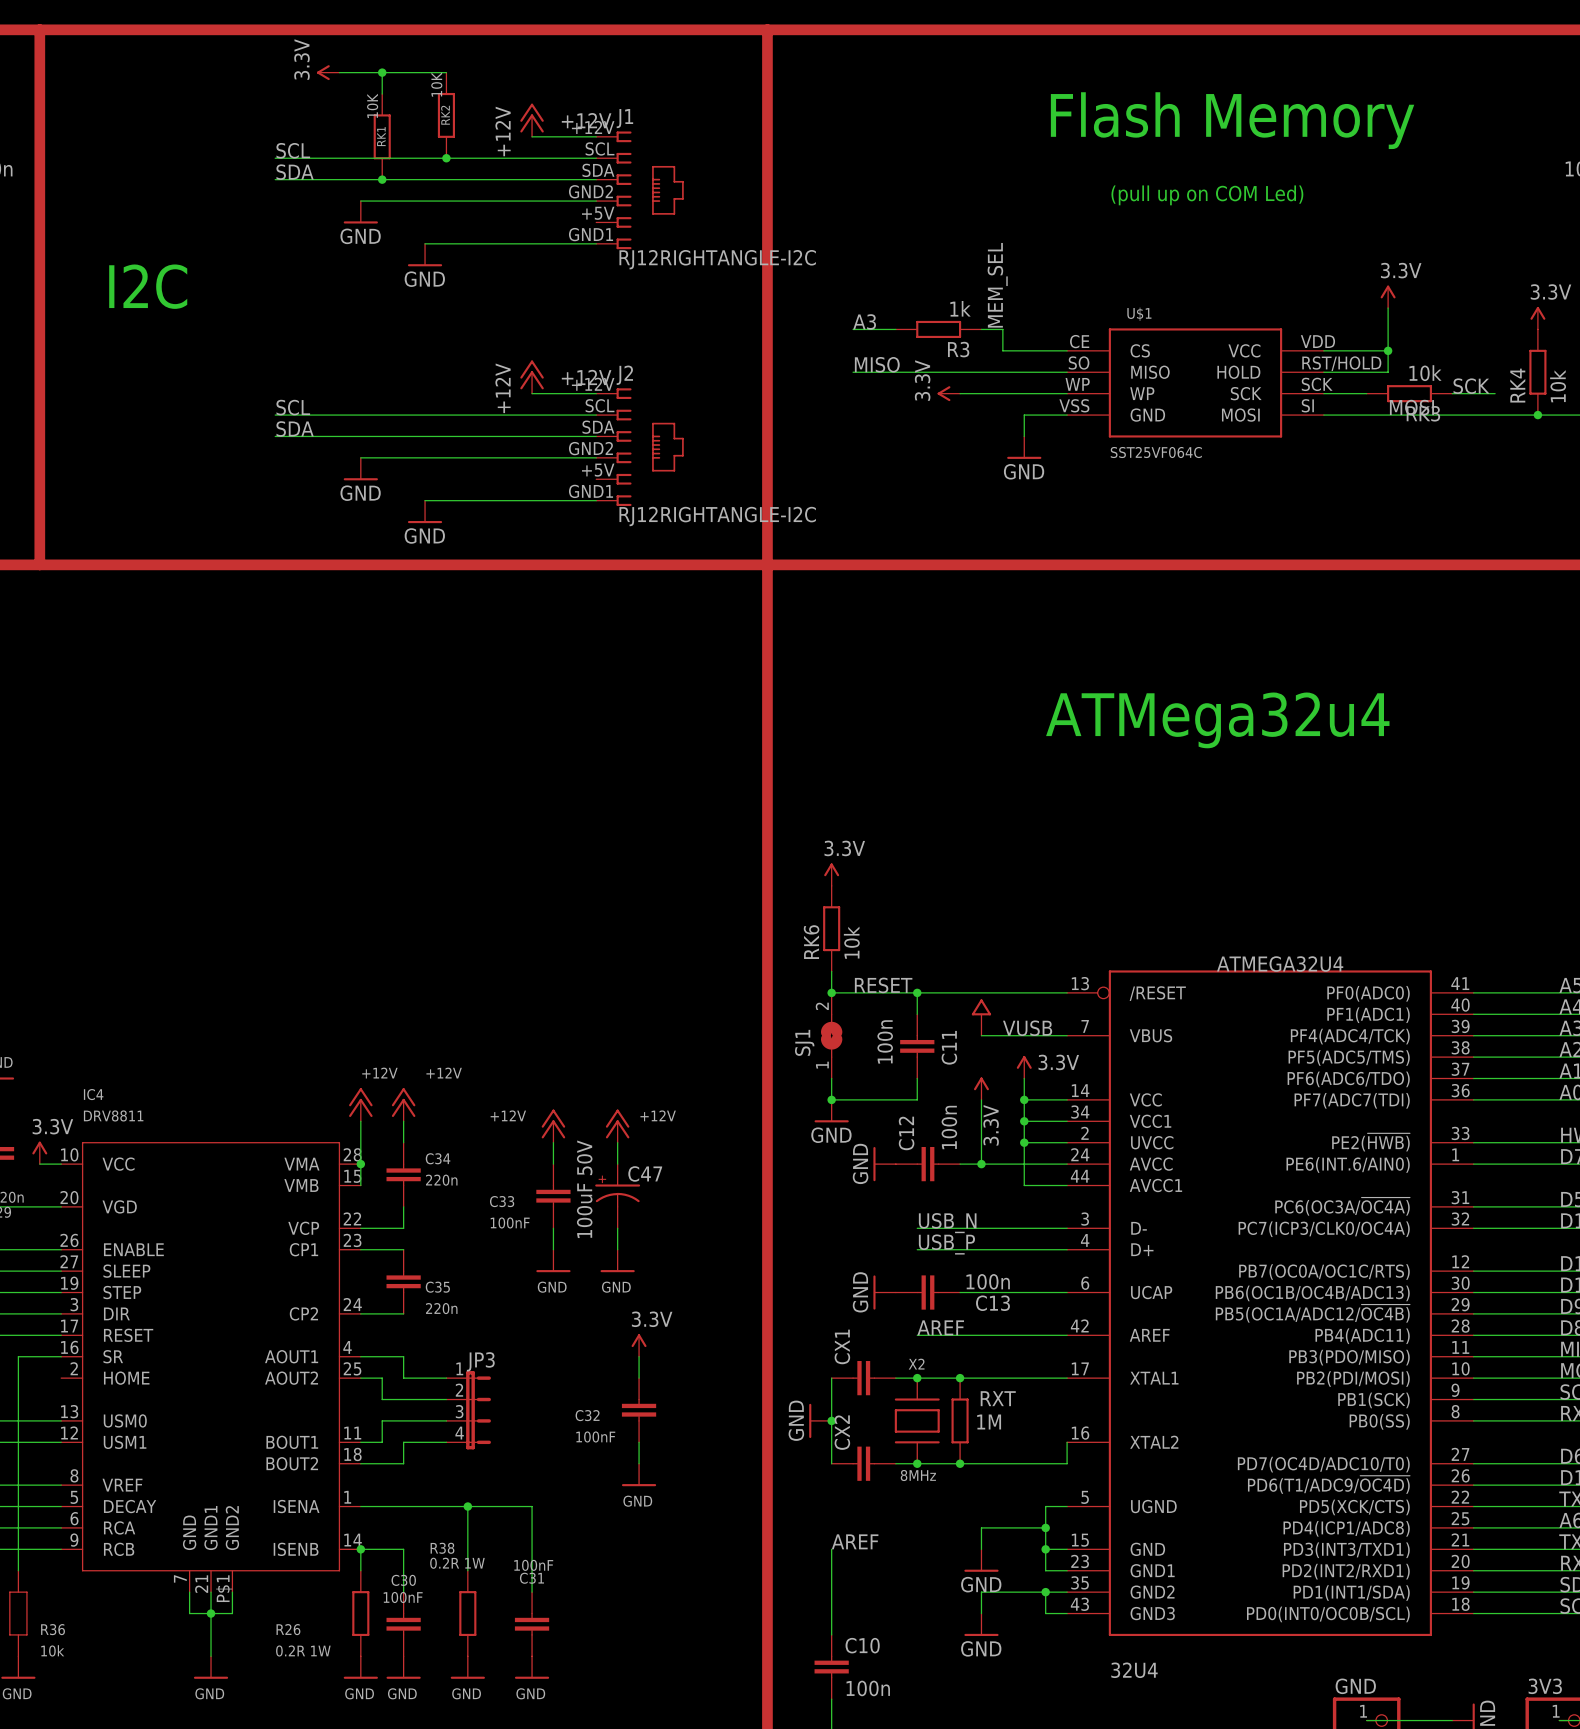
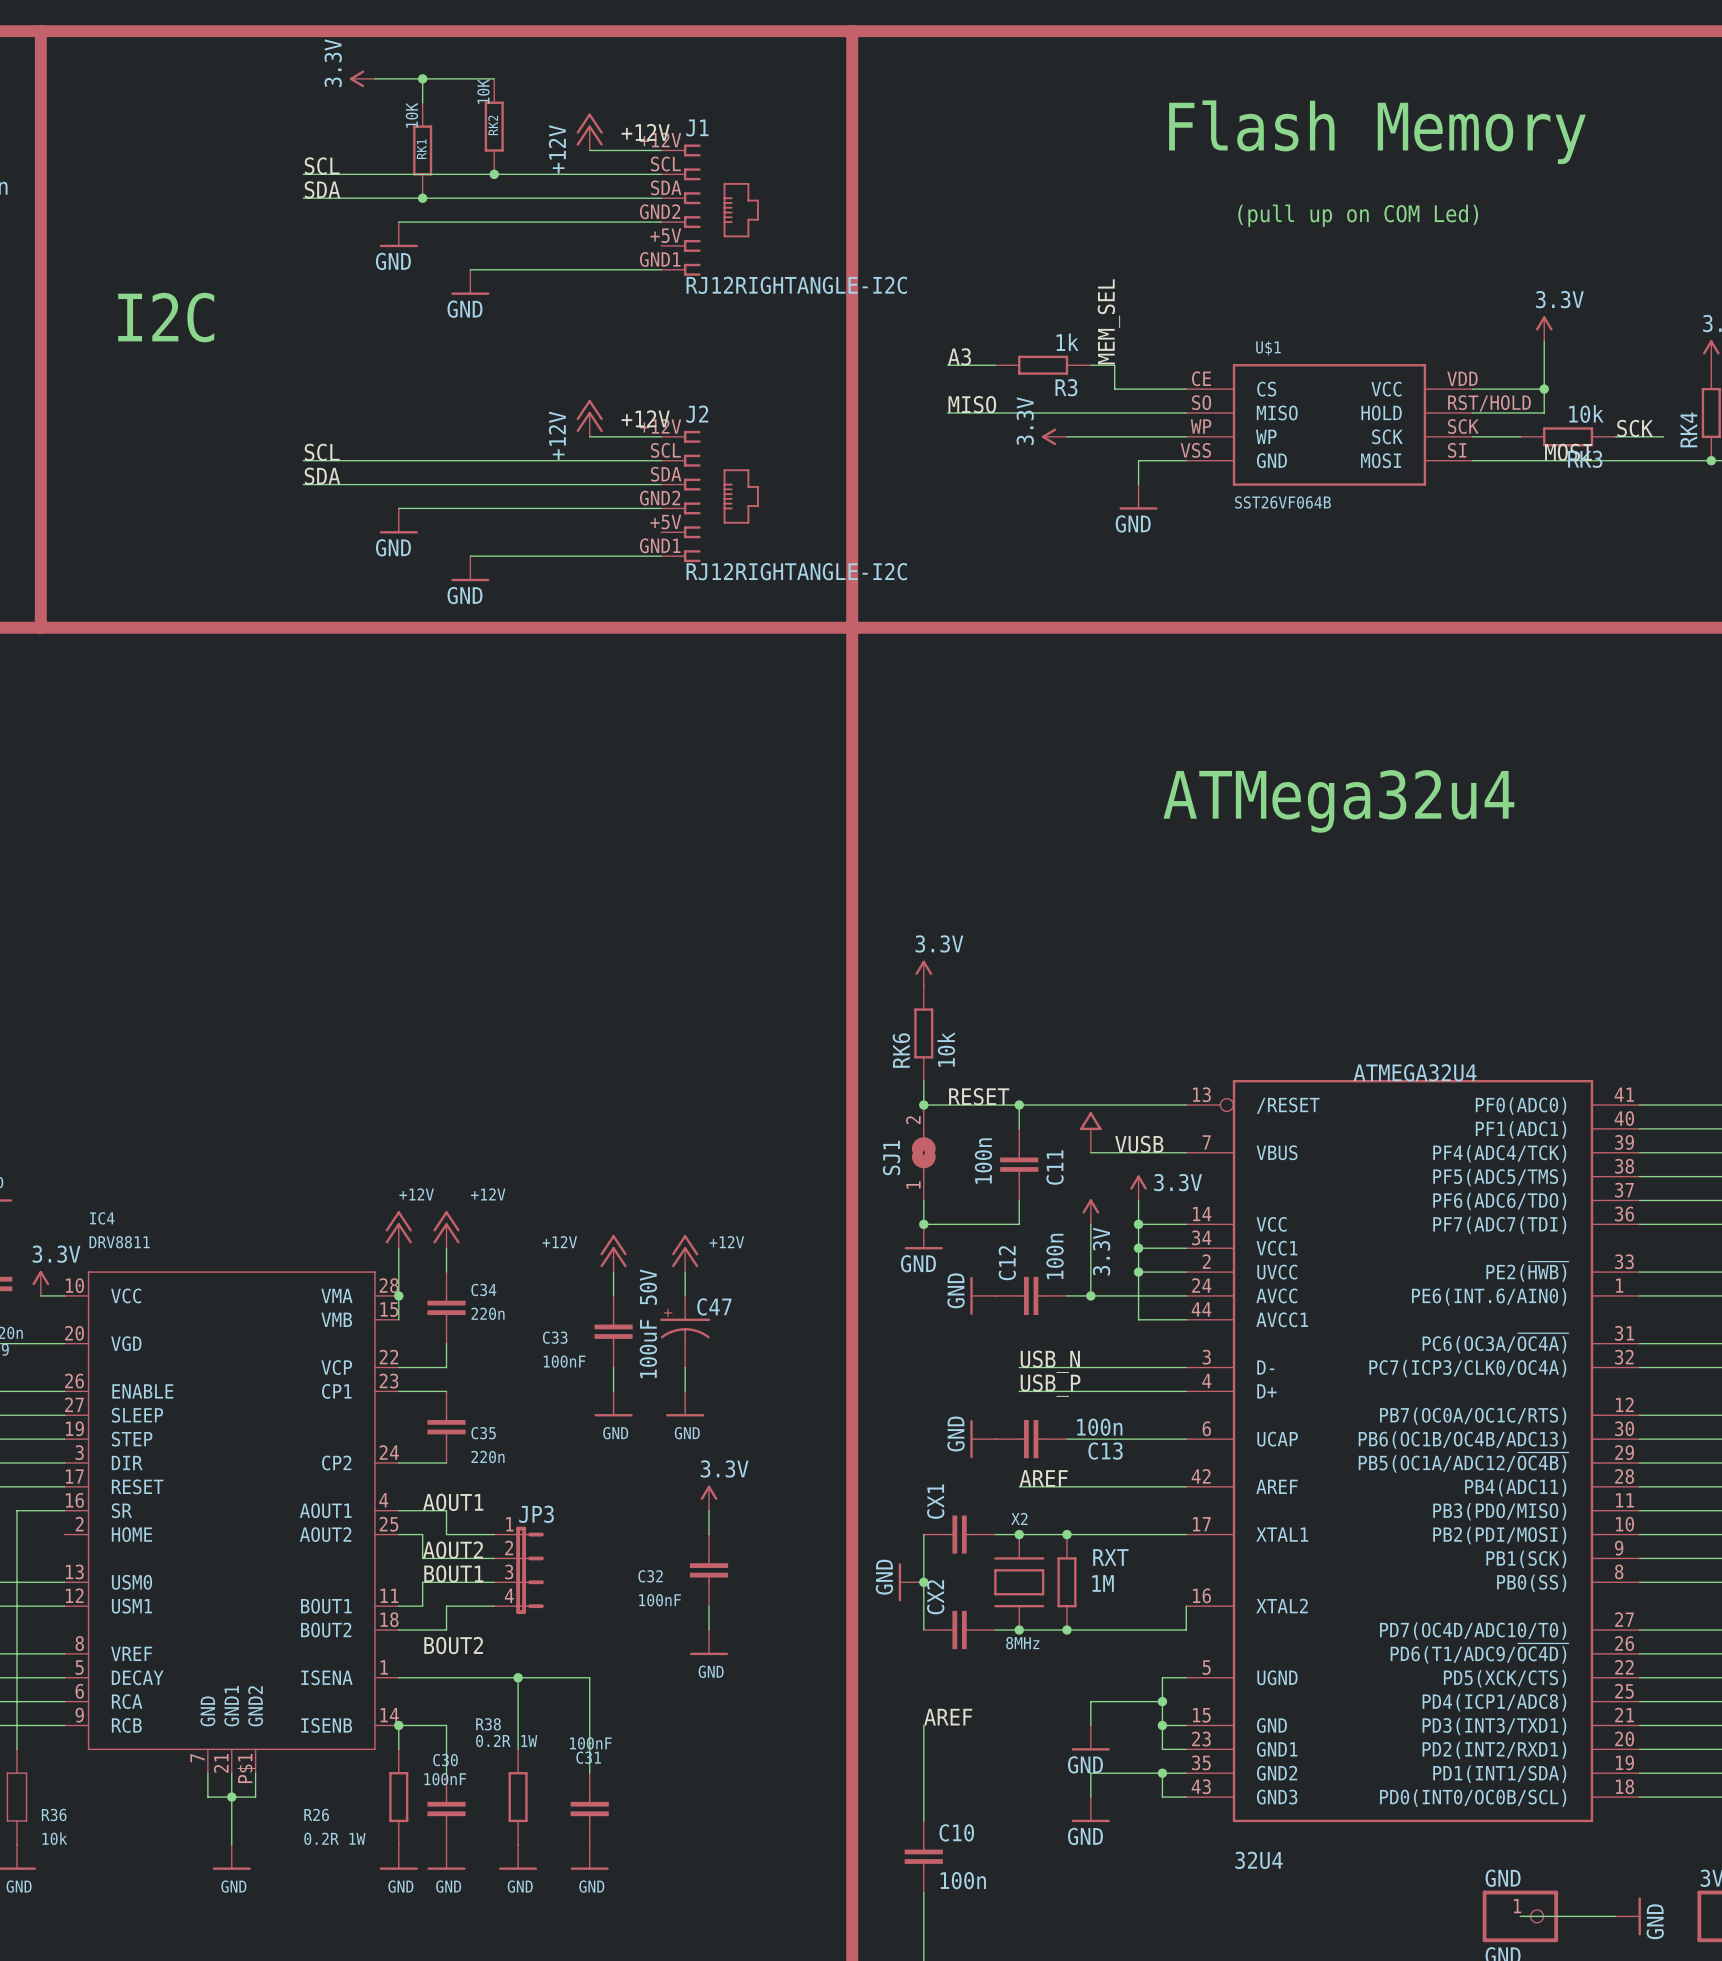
U$1 value: SST25VF064C (1156, 452) -> SST26VF064B (1282, 502)
label: none -> AOUT1 (453, 1502)
label: none -> AOUT2 (453, 1550)
label: none -> BOUT1 (453, 1573)
label: none -> BOUT2 (453, 1645)

